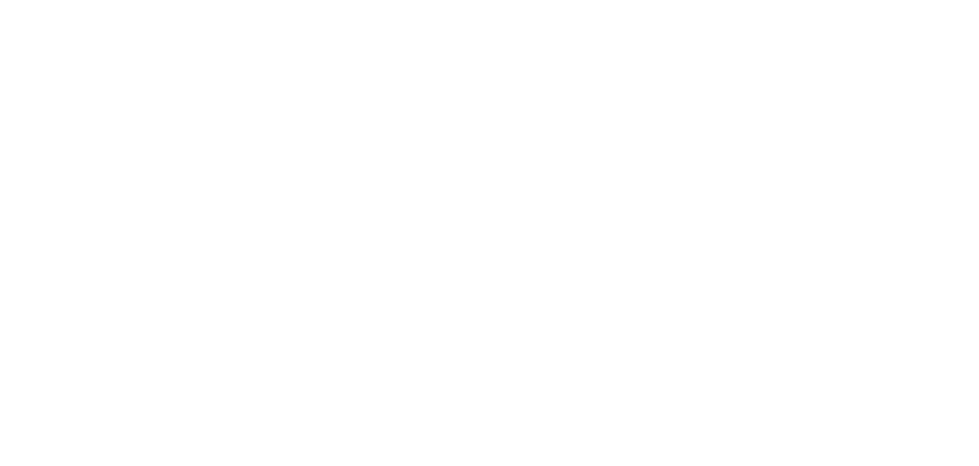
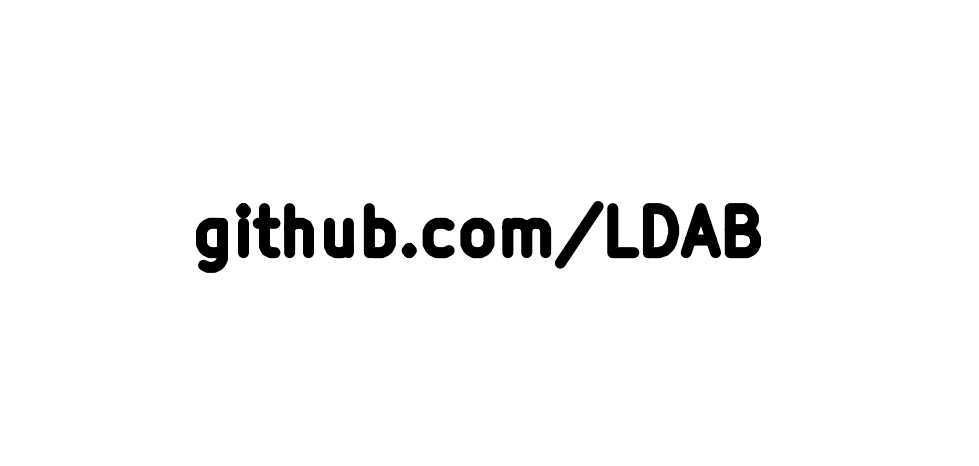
text: none -> github.com/LDAB (478, 236)

